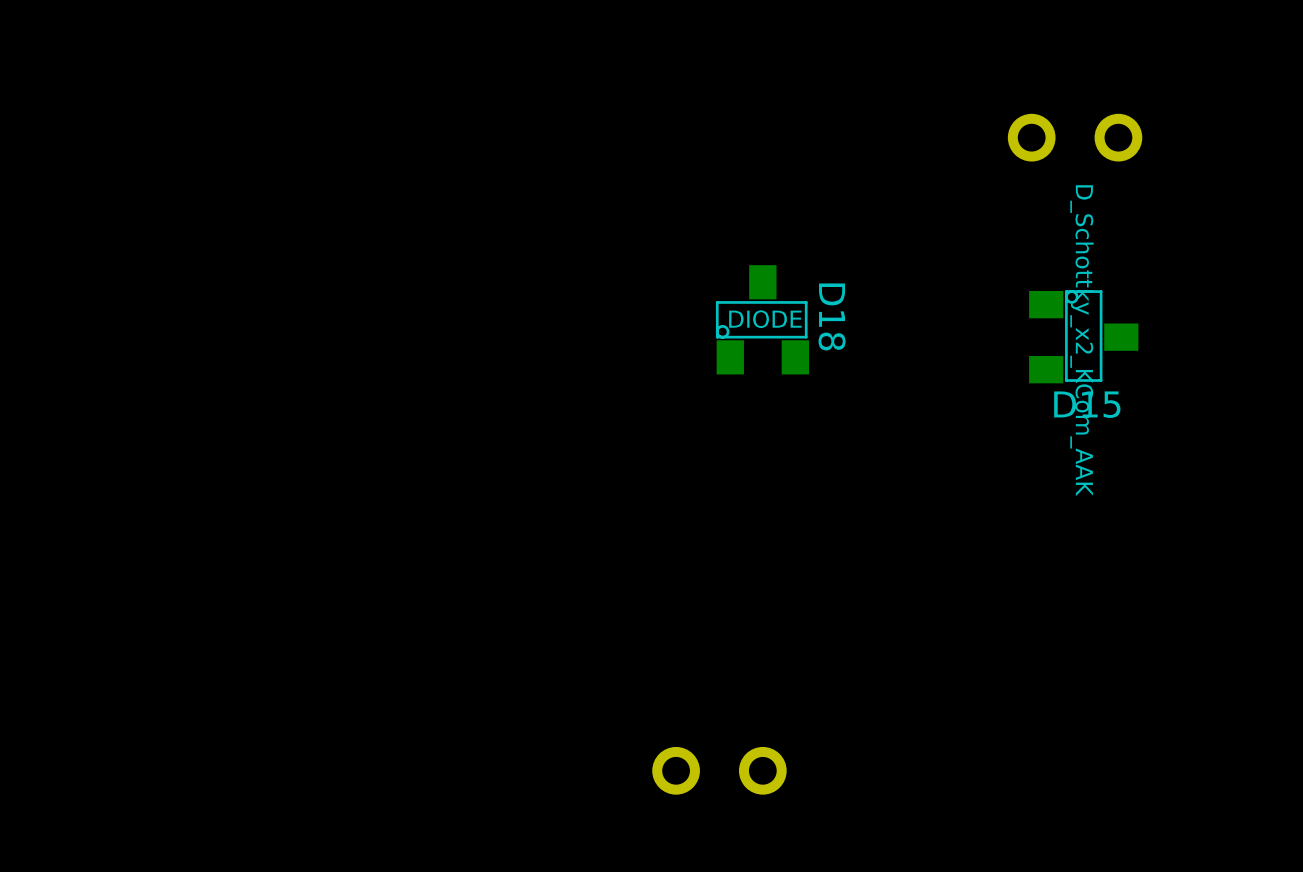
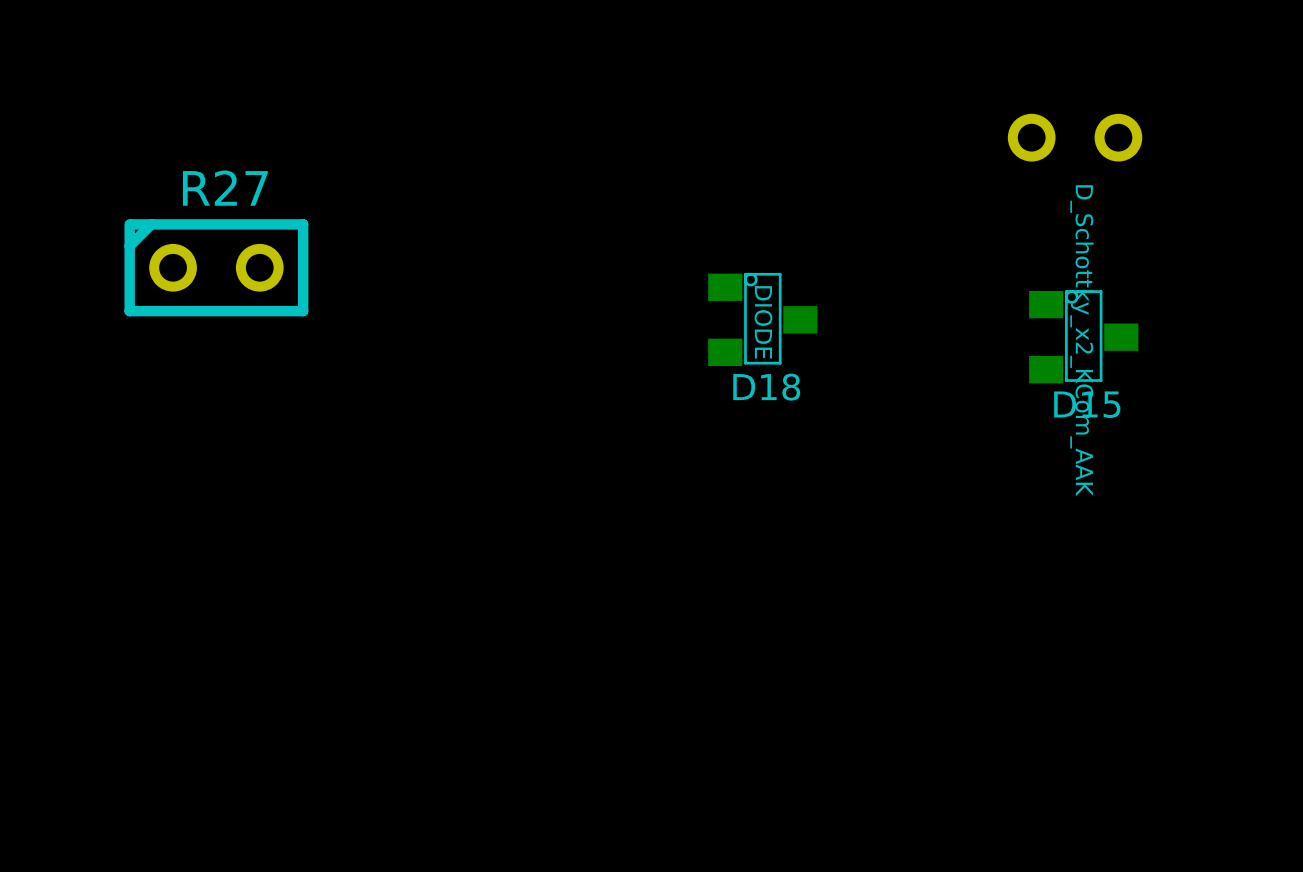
D18 rotation: 0° (762, 319) -> 90° clockwise (762, 319)
R27 side: top (719, 770) -> bottom (216, 267)

